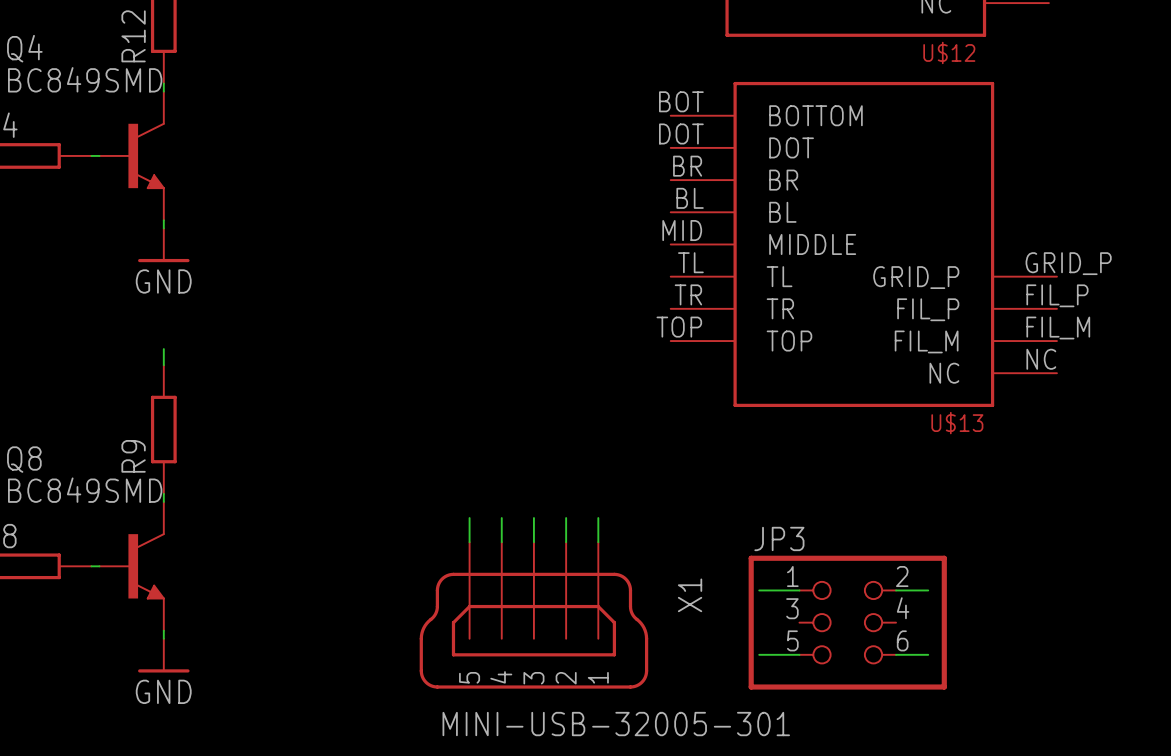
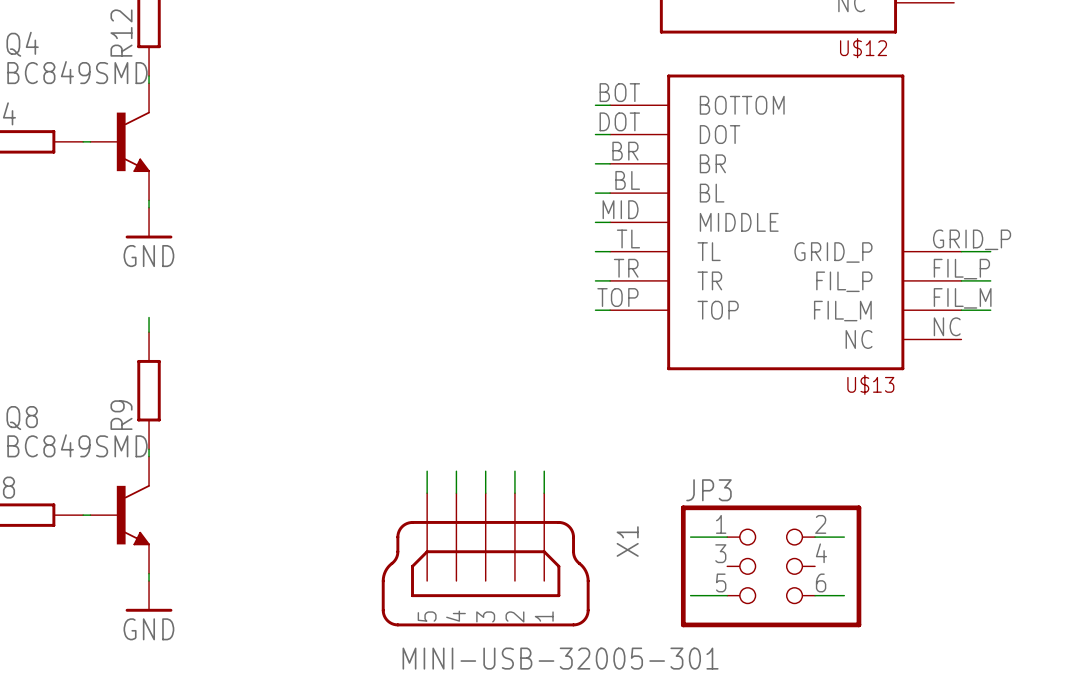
wire: none -> (595, 105) (610, 105)
wire: none -> (595, 134) (610, 134)
wire: none -> (595, 163) (610, 163)
wire: none -> (595, 193) (610, 193)
wire: none -> (595, 222) (610, 222)
wire: none -> (595, 251) (610, 251)
wire: none -> (961, 251) (990, 251)
wire: none -> (595, 280) (610, 280)
wire: none -> (961, 280) (990, 280)
wire: none -> (595, 310) (610, 310)
wire: none -> (961, 310) (990, 310)

